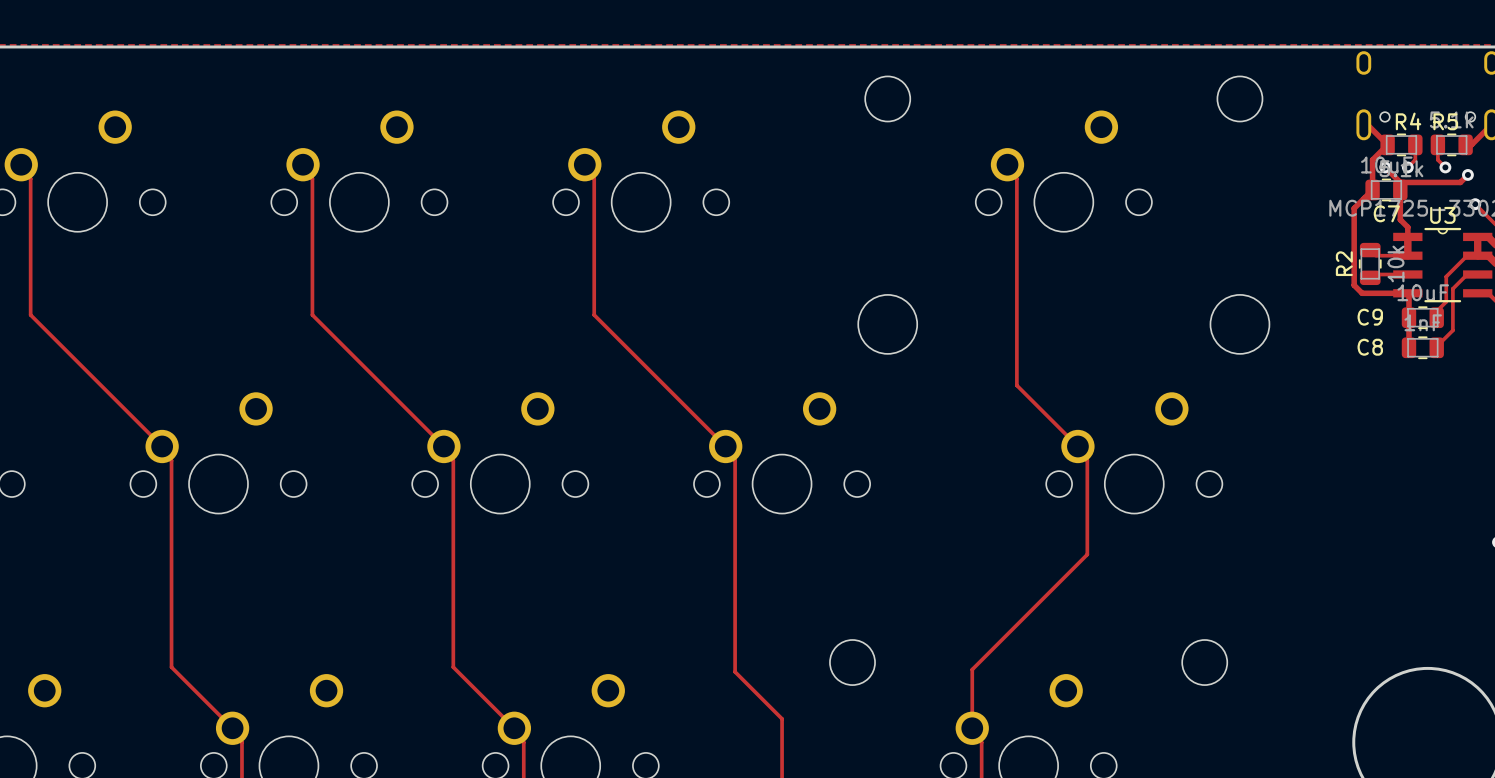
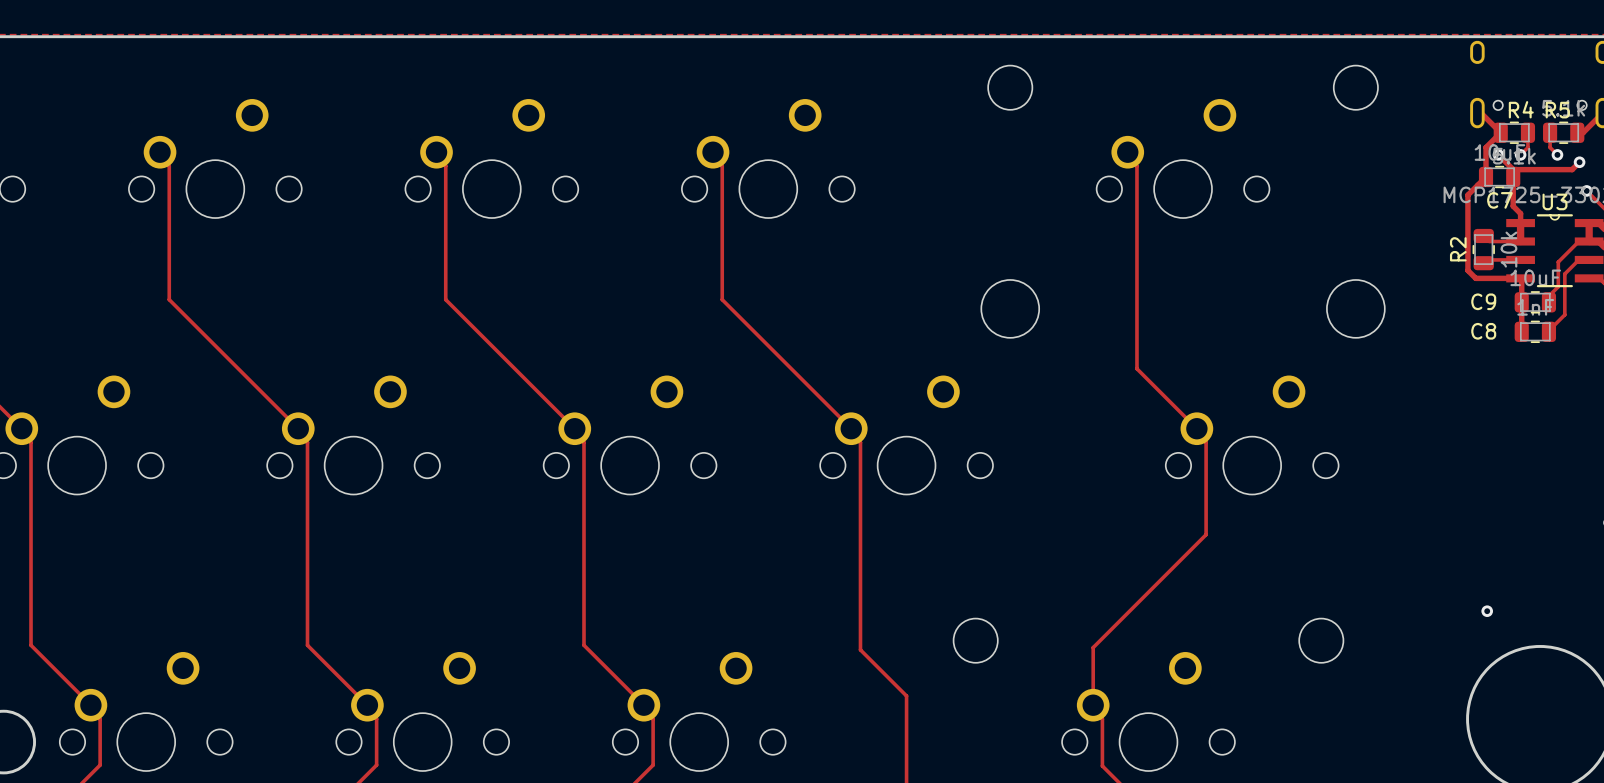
via: none -> (1487, 611)

